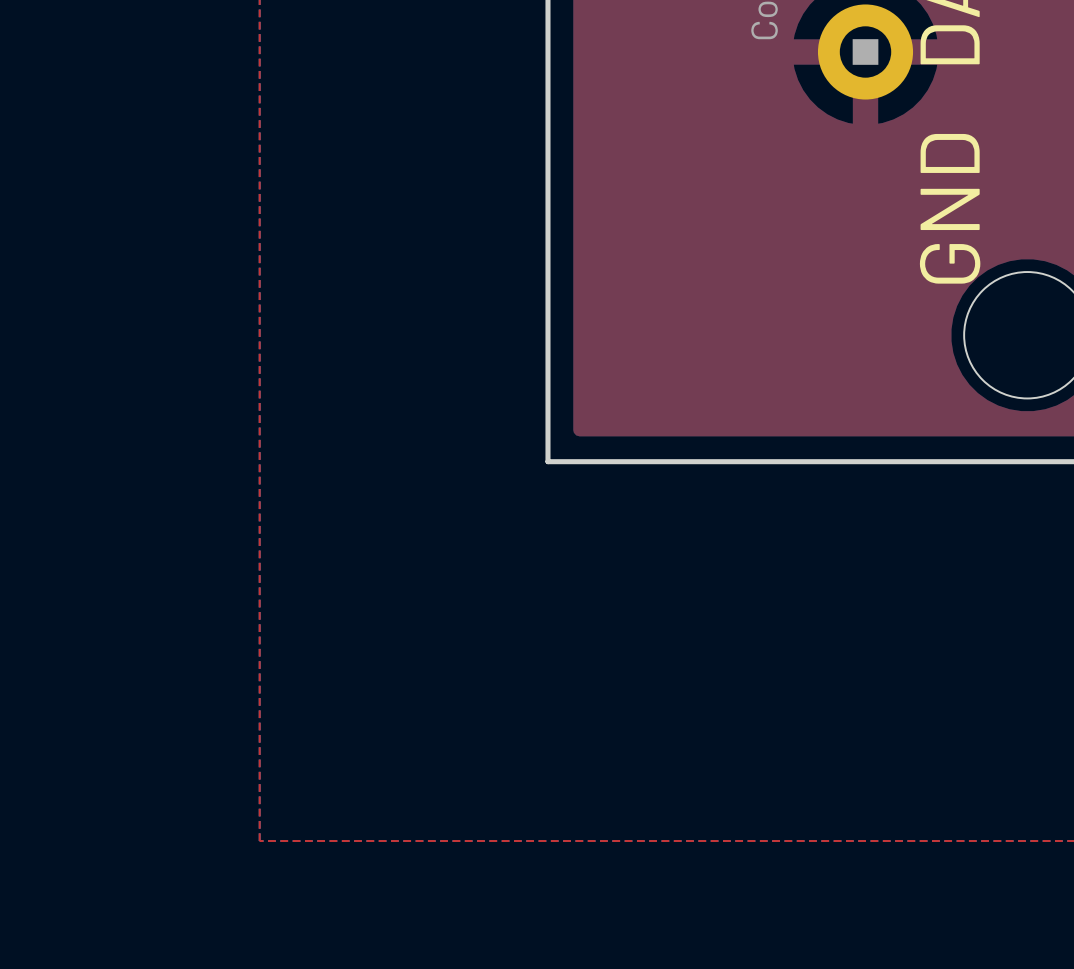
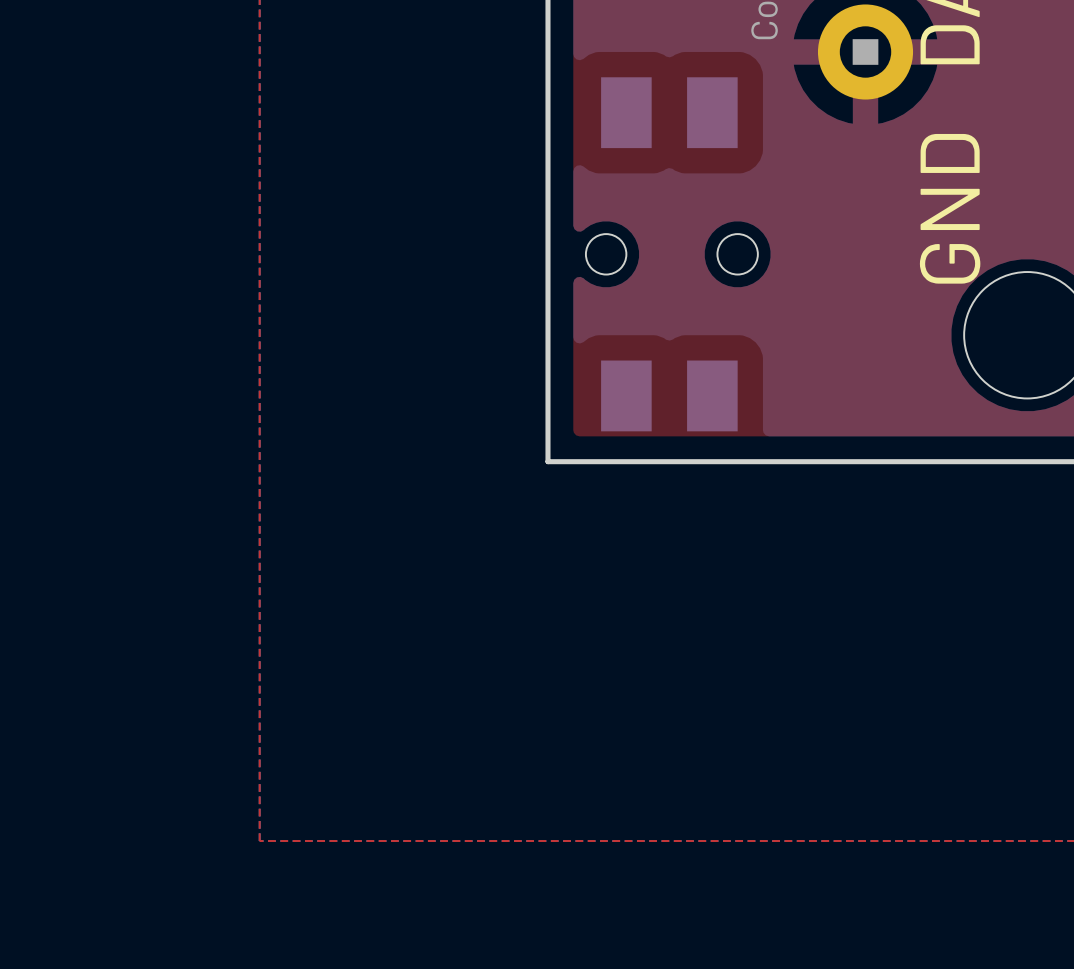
part: none -> (671, 254)

